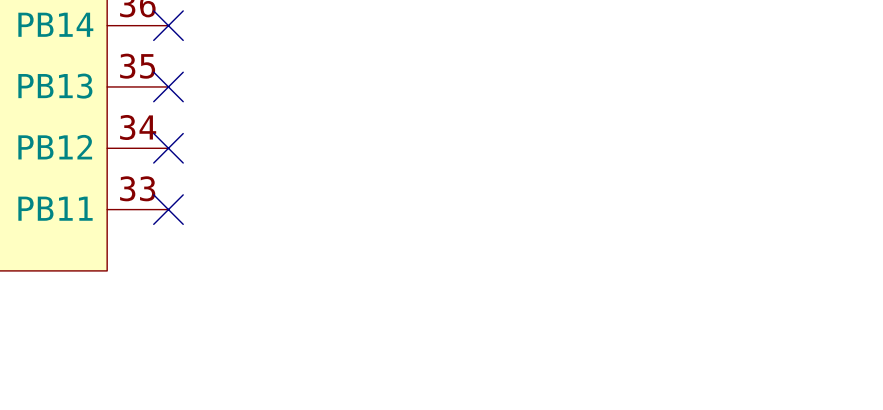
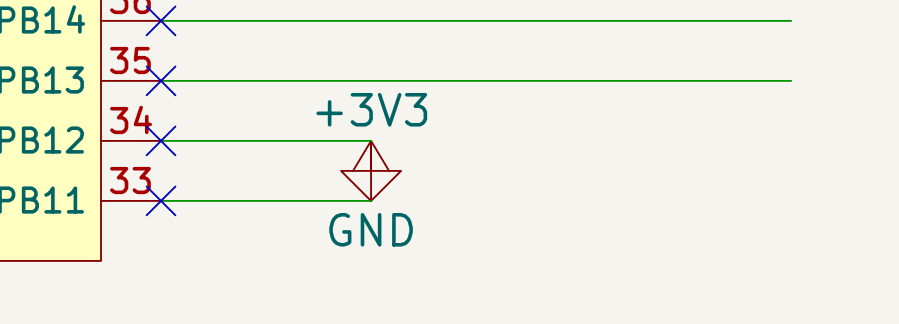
wire: none -> (161, 20) (791, 20)
wire: none -> (161, 80) (791, 80)
wire: none -> (161, 140) (371, 140)
power symbol: none -> +3V3 (371, 170)
power symbol: none -> GND (371, 170)
wire: none -> (161, 200) (371, 200)

